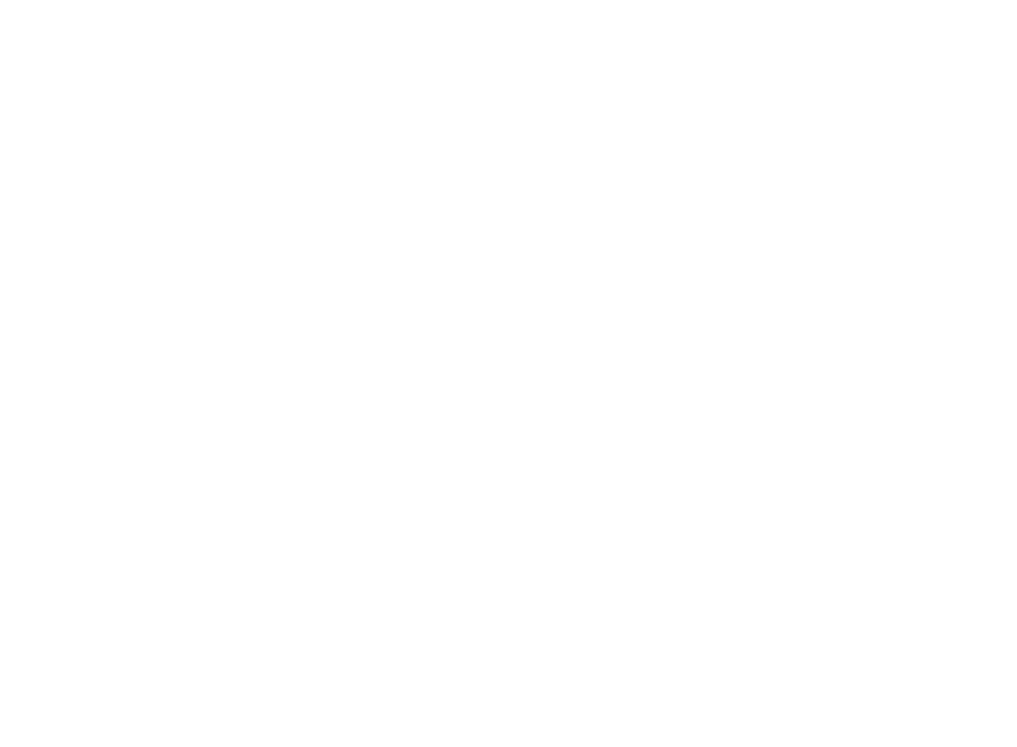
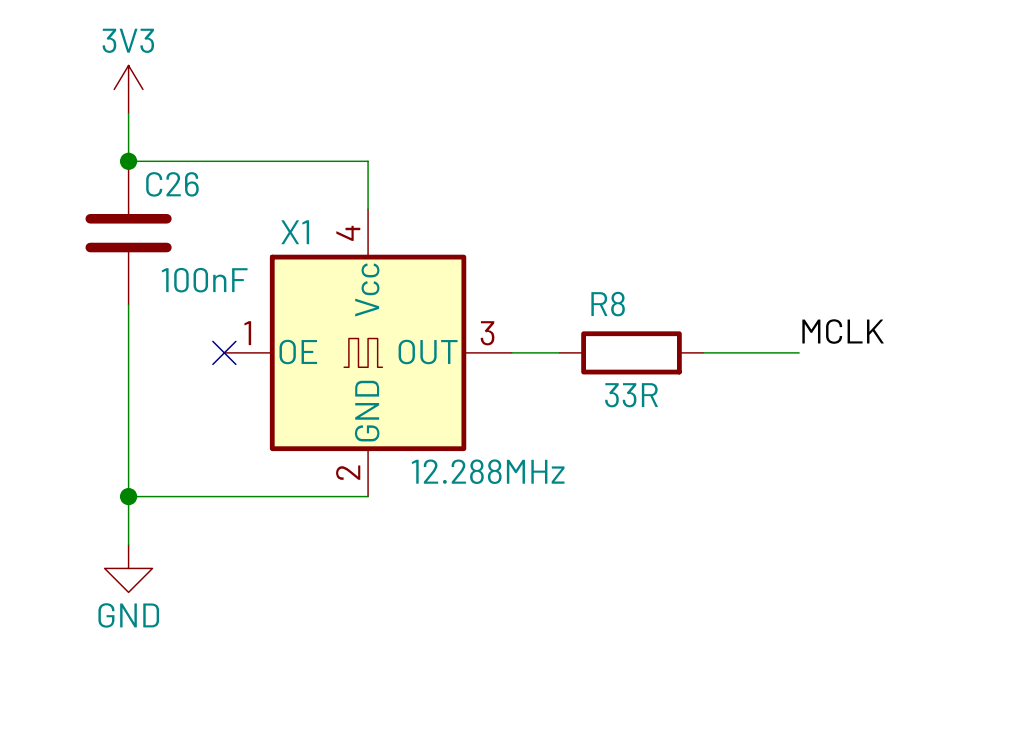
power symbol: none -> 3V3 (128, 89)
wire: none -> (128, 113) (128, 161) (368, 161) (368, 209)
junction: none -> (128, 161)
C26: none -> 100nF (128, 233)
wire: none -> (128, 305) (128, 544)
label: none -> MCLK (843, 331)
no-connect mark: none -> (224, 352)
X1: none -> 12.288MHz (368, 352)
wire: none -> (511, 352) (559, 352)
R8: none -> 33R (631, 352)
wire: none -> (703, 352) (799, 352)
wire: none -> (128, 496) (368, 496)
junction: none -> (128, 496)
power symbol: none -> GND (128, 568)

